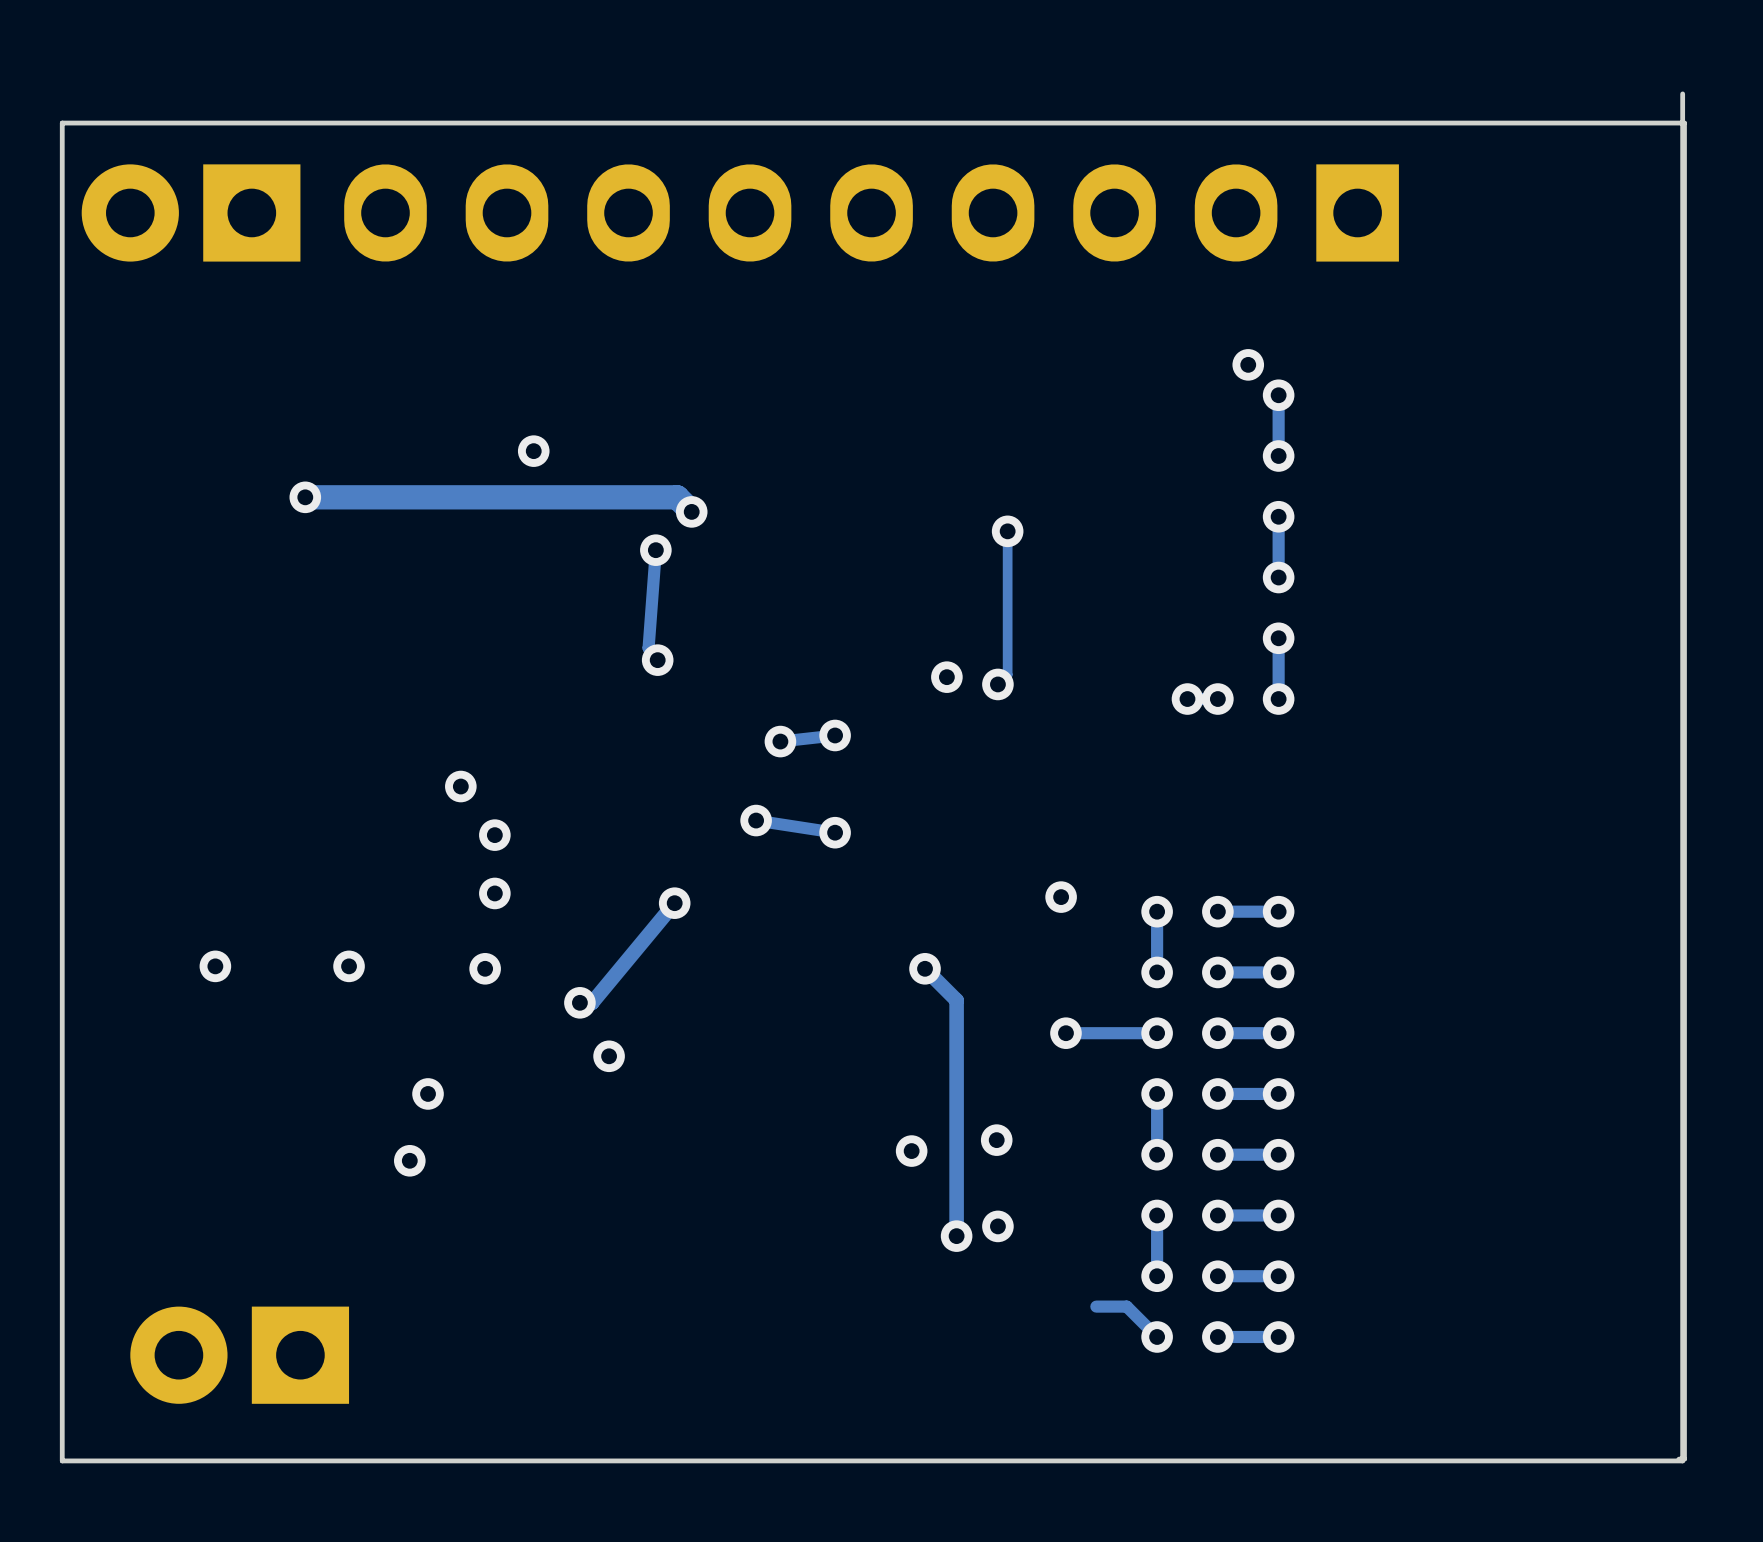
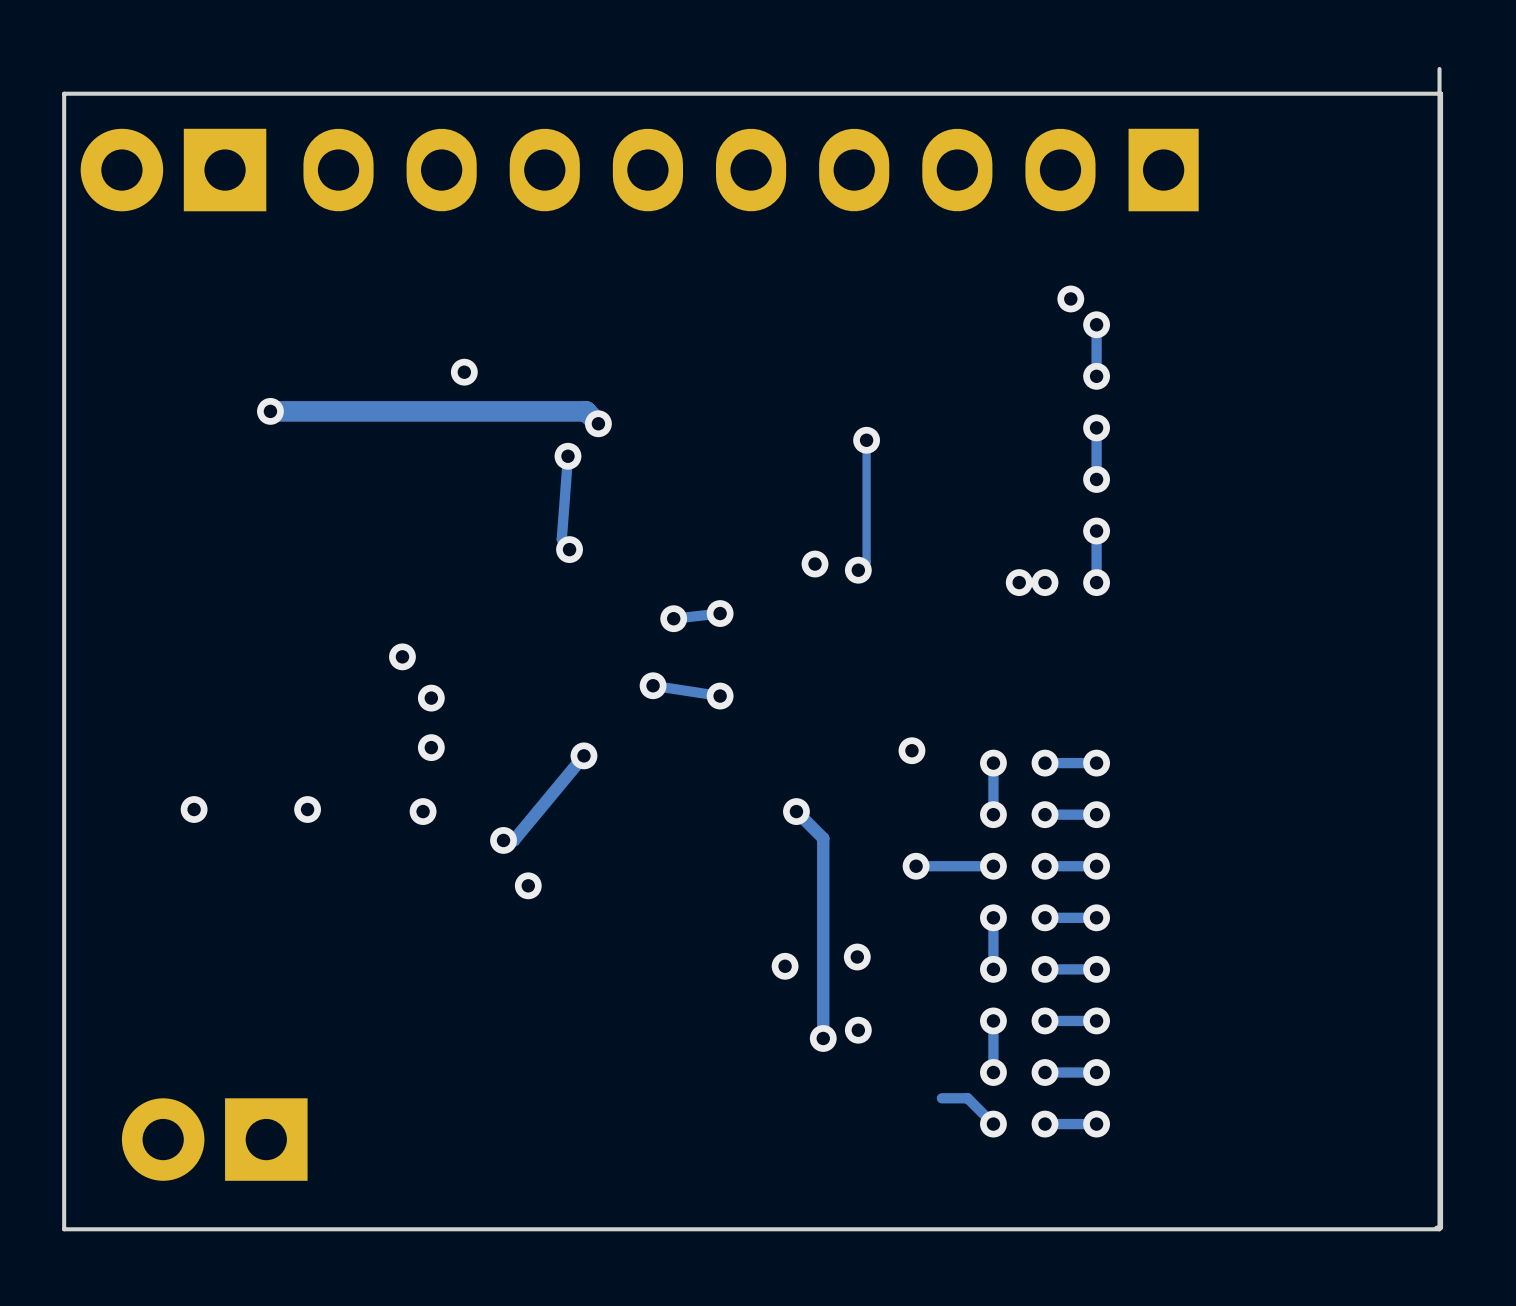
via: (428, 1093) -> none
via: (409, 1160) -> none

